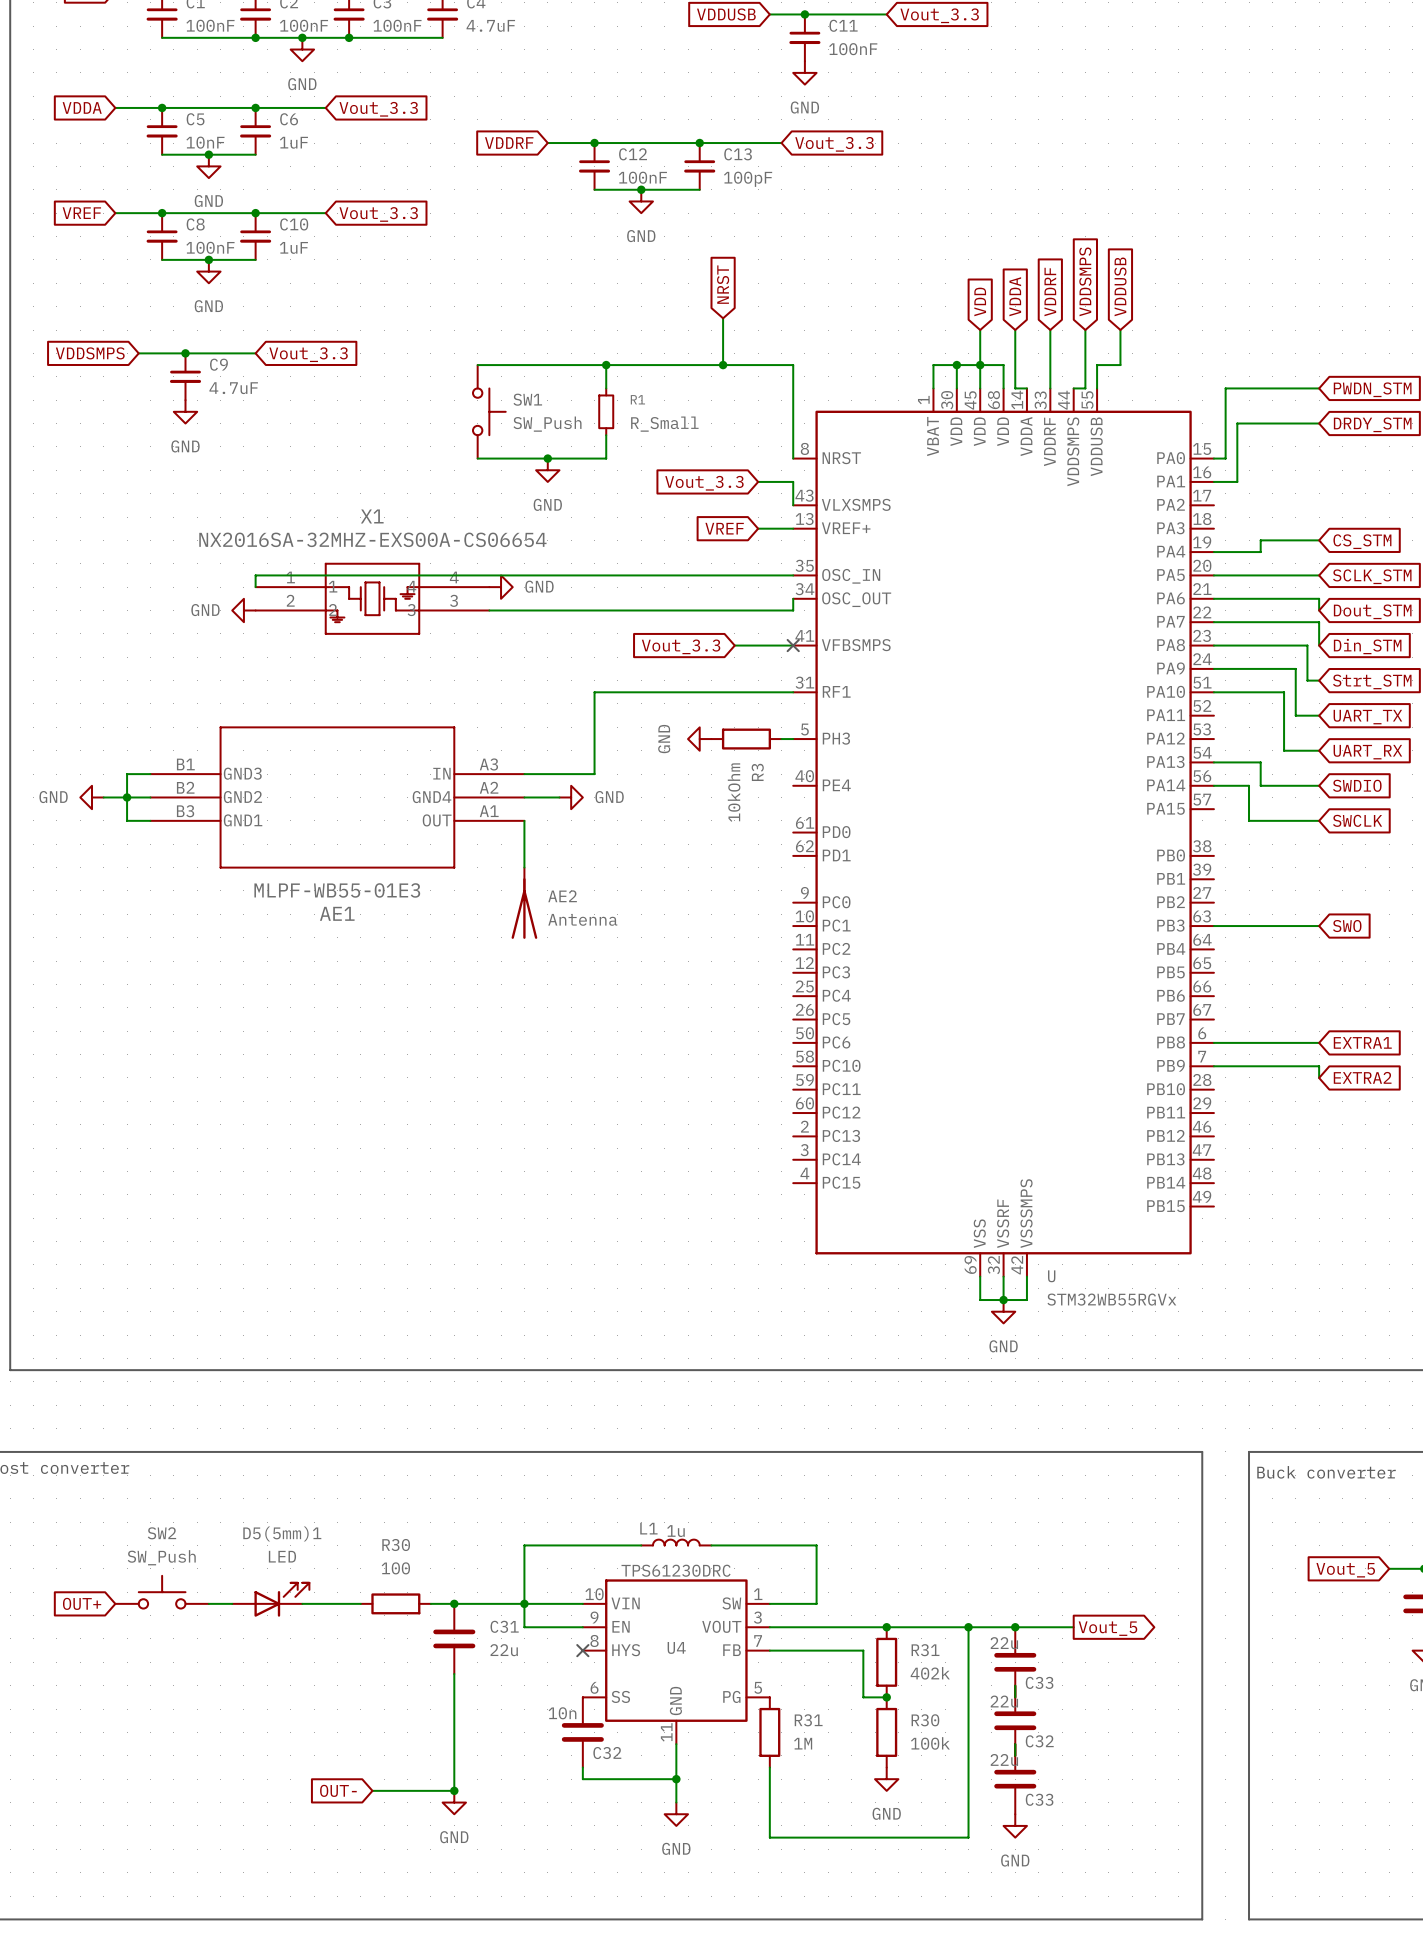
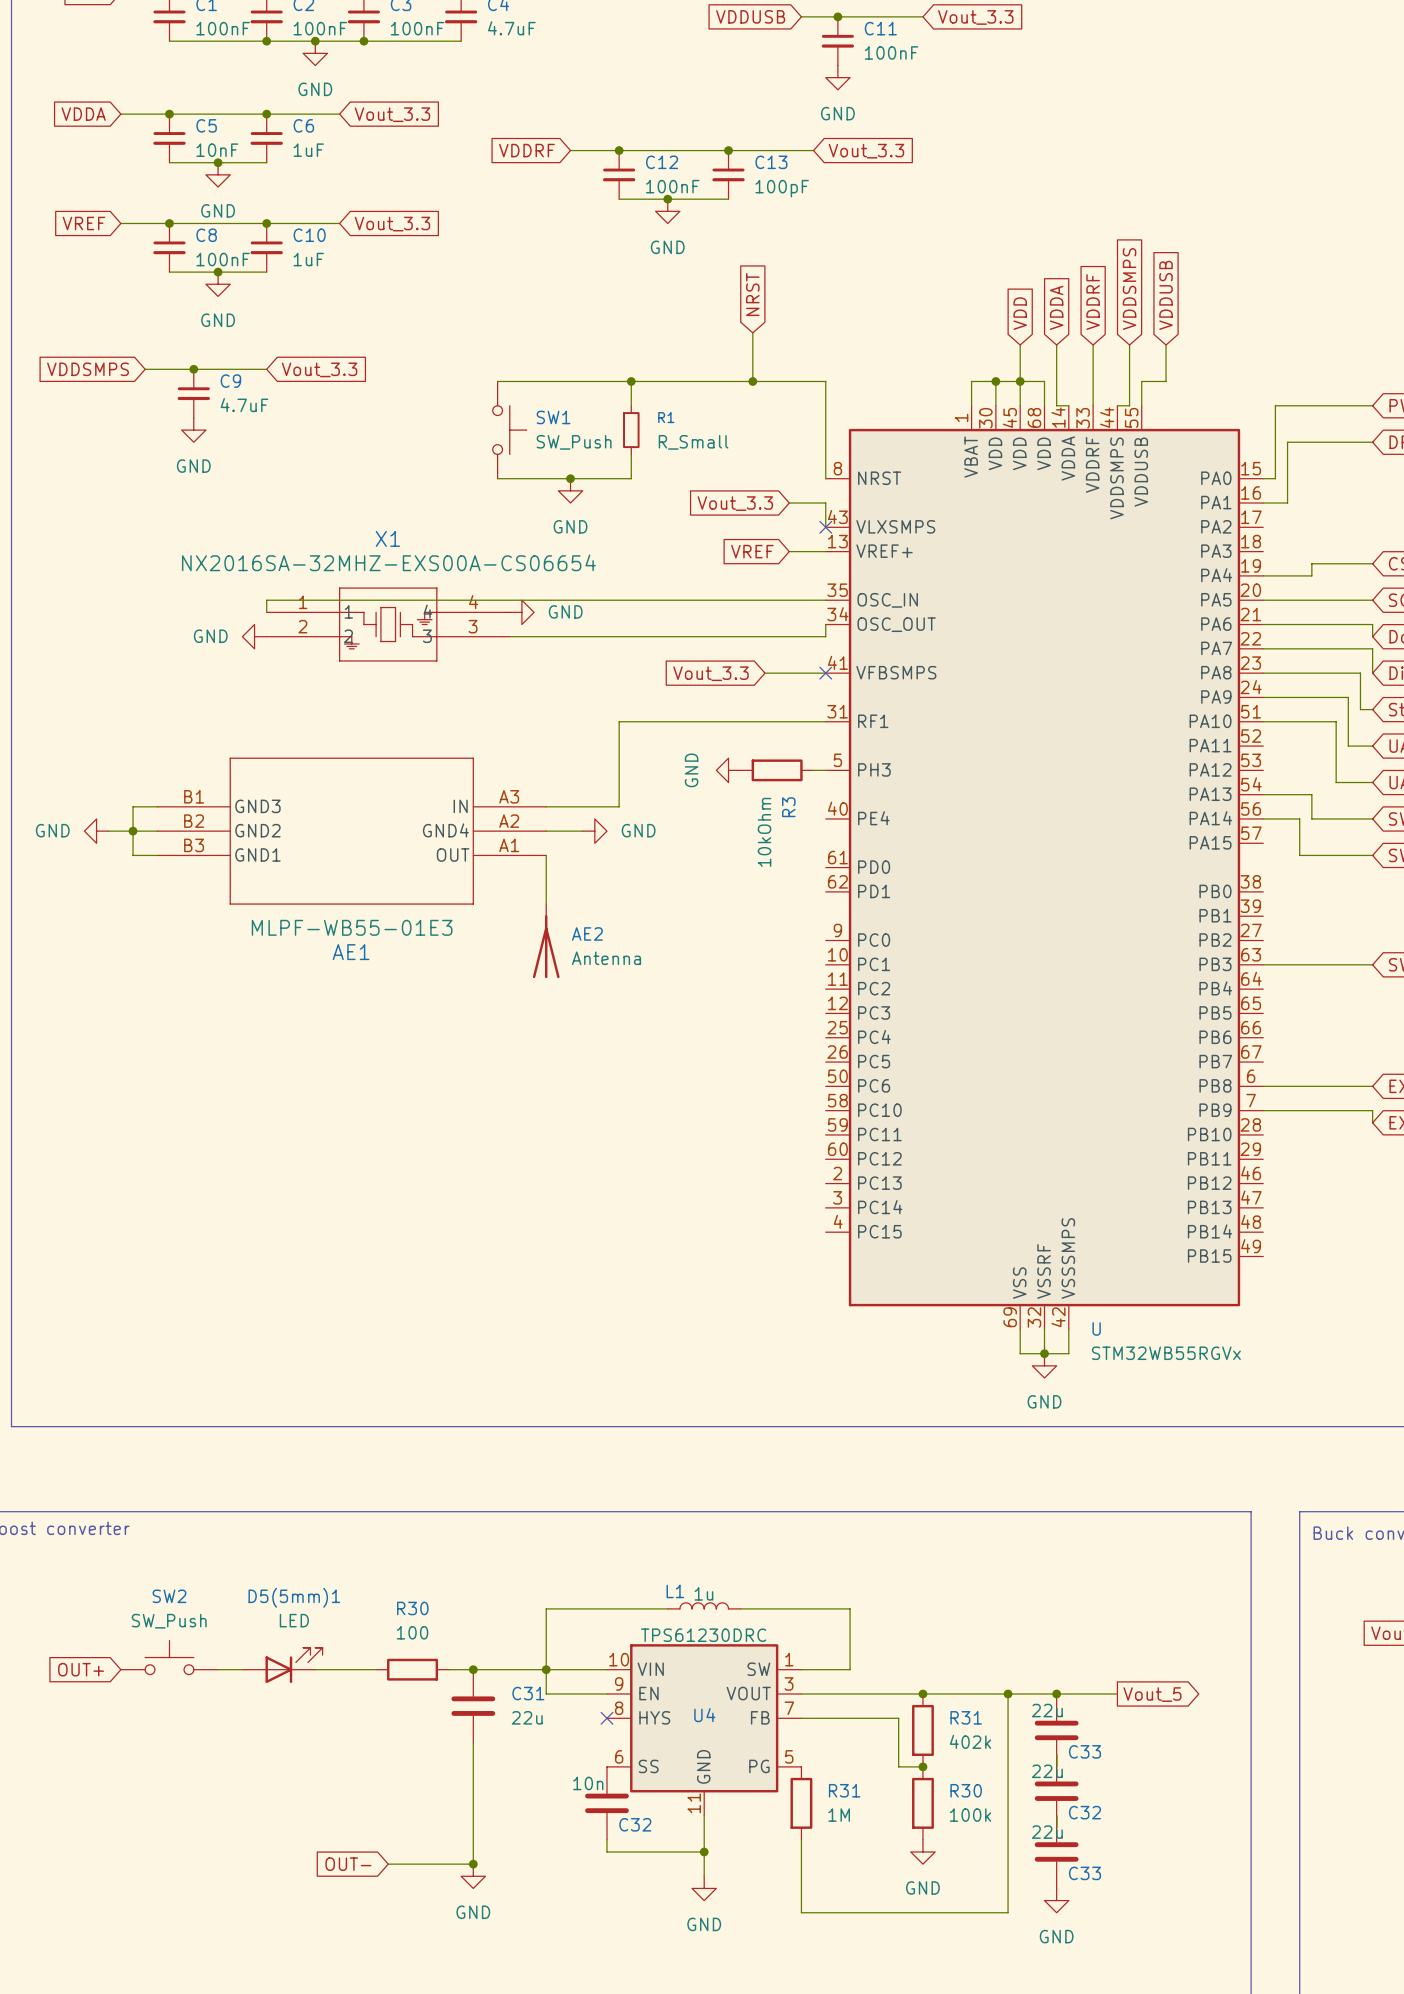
no-connect mark: none -> (825, 527)

